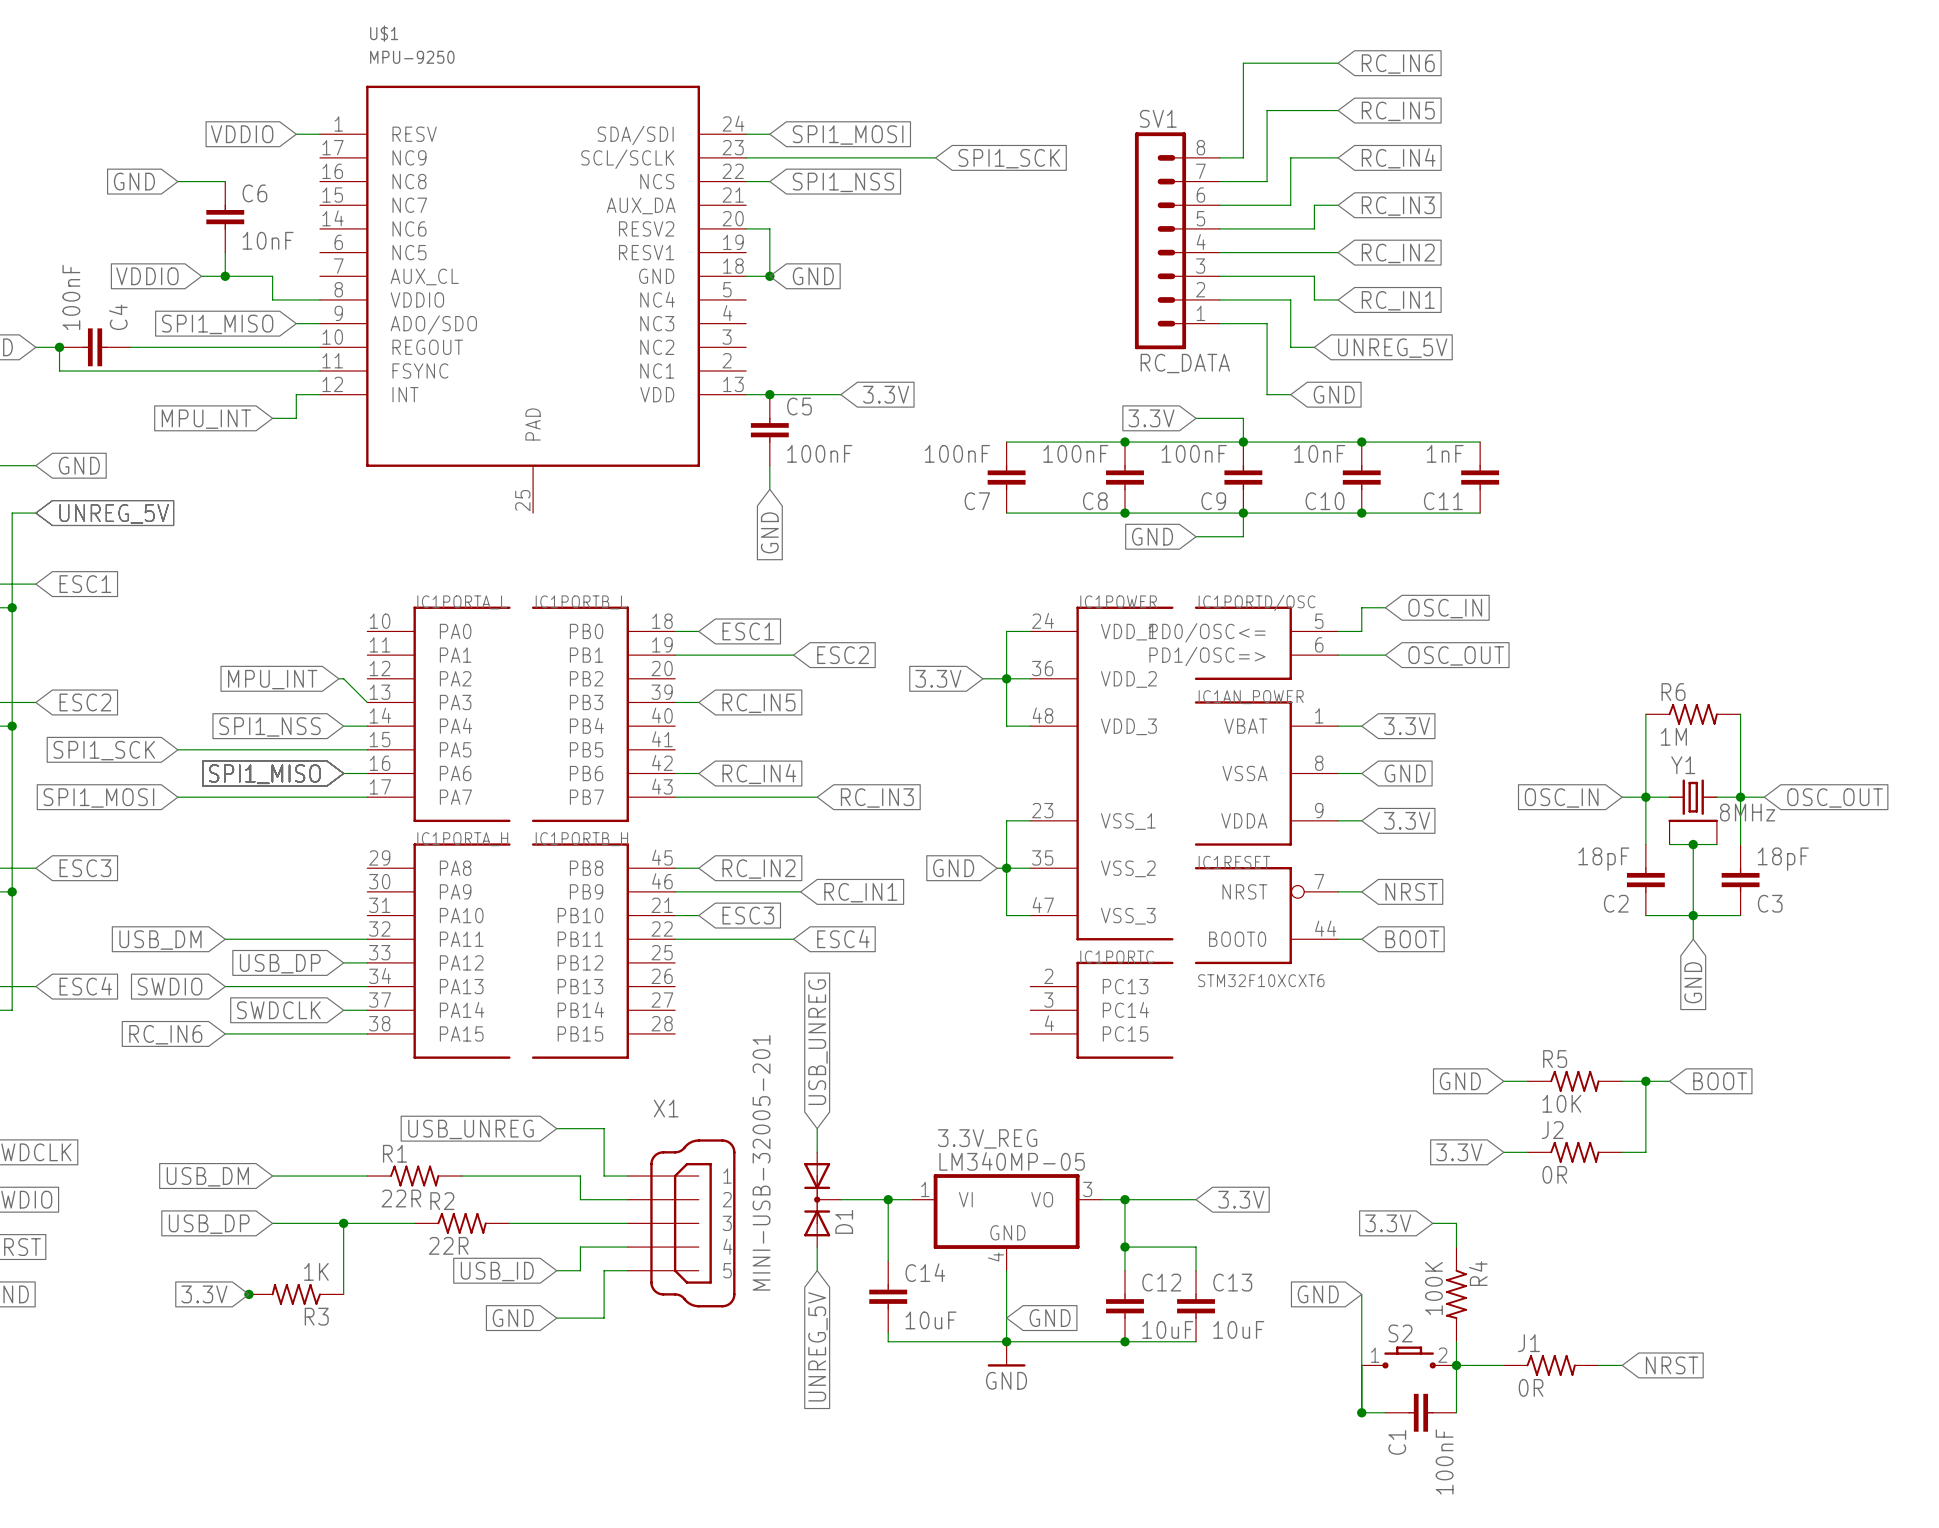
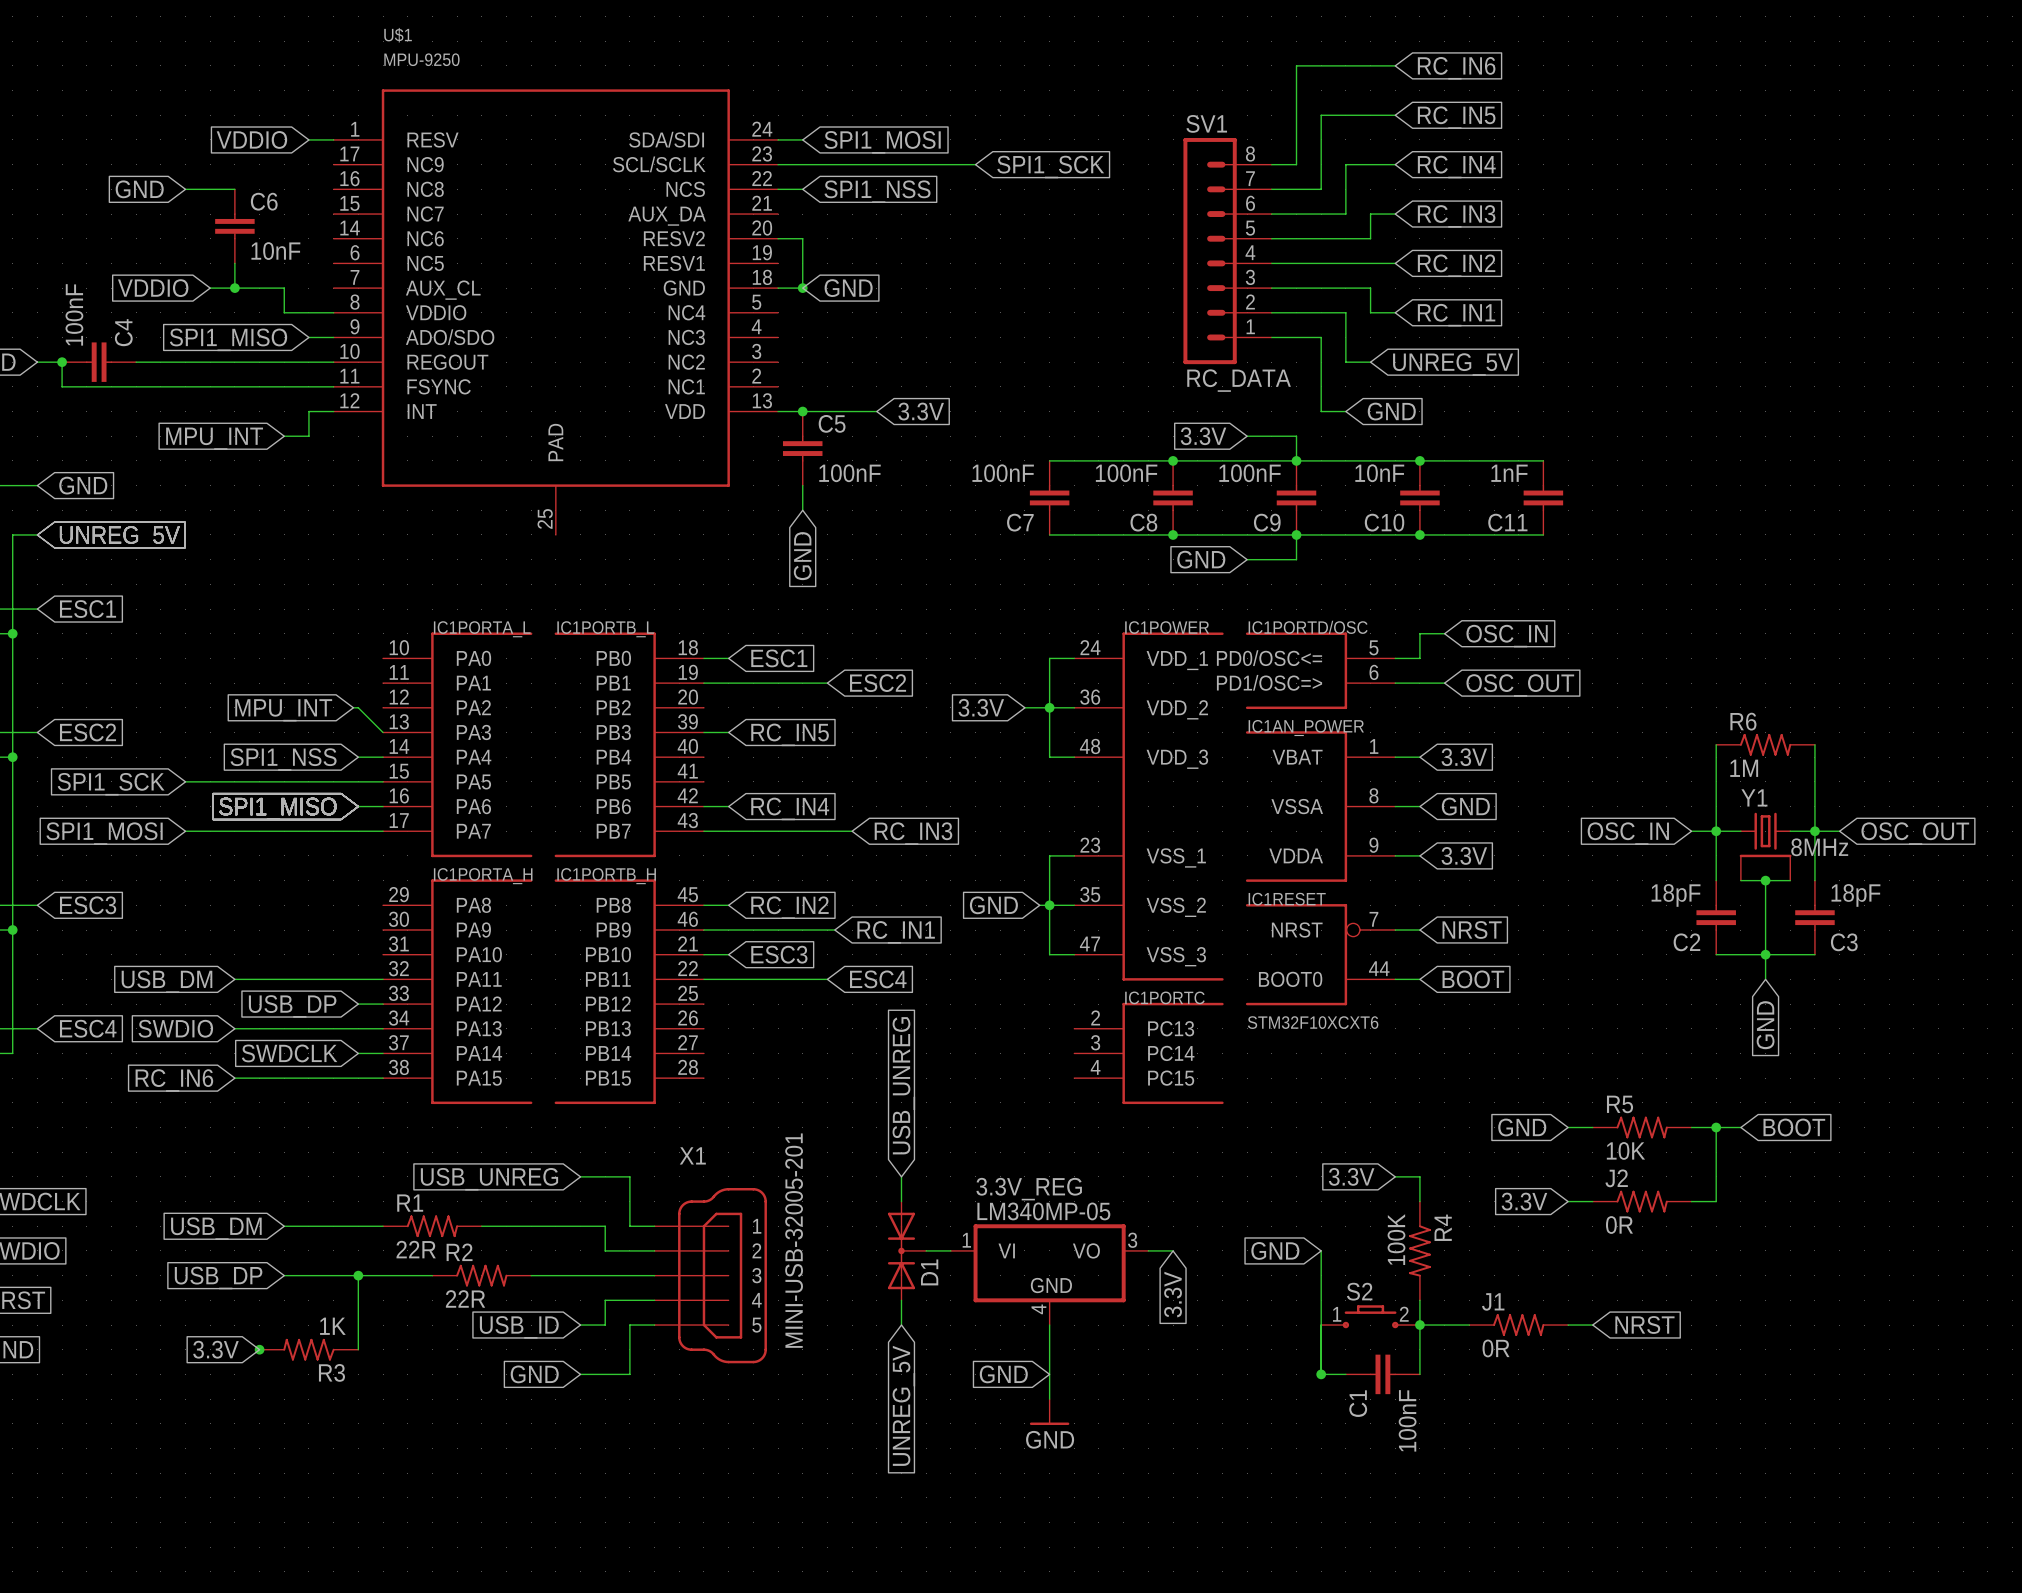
global label position: USB_UNREG (817, 1042) -> USB_UNREG (903, 1085)
wire: (817, 1128) (817, 1152) -> (901, 1176) (901, 1201)
global label: none -> 3.3V (1351, 1176)
D1 position: (822, 1199) -> (907, 1250)
wire: (840, 1199) (888, 1199) (888, 1261) -> none
junction: (888, 1199) -> none
junction: (1124, 1199) -> none
wire: (1196, 1199) (1124, 1199) (1124, 1270) -> none
global label rotation: 0° (1241, 1199) -> 90° clockwise (1173, 1294)
global label position: 3.3V (1241, 1199) -> 3.3V (1173, 1294)
wire: none -> (1321, 1250) (1321, 1374) (1345, 1374)
global label: 3.3V (1388, 1223) -> none
wire: (1432, 1223) (1456, 1223) (1456, 1247) -> (1395, 1176) (1419, 1176) (1419, 1201)
wire: (817, 1247) (817, 1270) -> (901, 1300) (901, 1325)
wire: (1124, 1247) (1196, 1247) (1196, 1270) -> none
junction: (1124, 1247) -> none
wire: none -> (1419, 1300) (1419, 1349)
junction: none -> (1419, 1325)
global label position: GND (1318, 1294) -> GND (1275, 1250)
R4 position: (1456, 1294) -> (1419, 1250)
C14: 10uF (888, 1296) -> none
C12: 10uF (1124, 1306) -> none
C13: 10uF (1196, 1306) -> none
global label rotation: 0° (1050, 1318) -> 180° (1003, 1374)
global label position: GND (1050, 1318) -> GND (1003, 1374)
junction: none -> (1321, 1374)
wire: (1361, 1318) (1361, 1412) (1385, 1412) -> none
wire: (888, 1332) (888, 1341) (1196, 1341) -> none
junction: (1006, 1341) -> none
junction: (1124, 1341) -> none
wire: (1456, 1341) (1456, 1412) -> none
global label position: UNREG_5V (817, 1346) -> UNREG_5V (903, 1405)
S2 position: (1409, 1357) -> (1370, 1316)
wire: (1456, 1365) (1503, 1365) -> (1419, 1325) (1469, 1325)
junction: (1456, 1365) -> none
J1 position: (1551, 1365) -> (1518, 1325)
wire: (1598, 1365) (1622, 1365) -> (1568, 1325) (1592, 1325)
global label position: NRST (1672, 1365) -> NRST (1644, 1325)
junction: (1361, 1412) -> none
C1 position: (1420, 1412) -> (1382, 1374)

